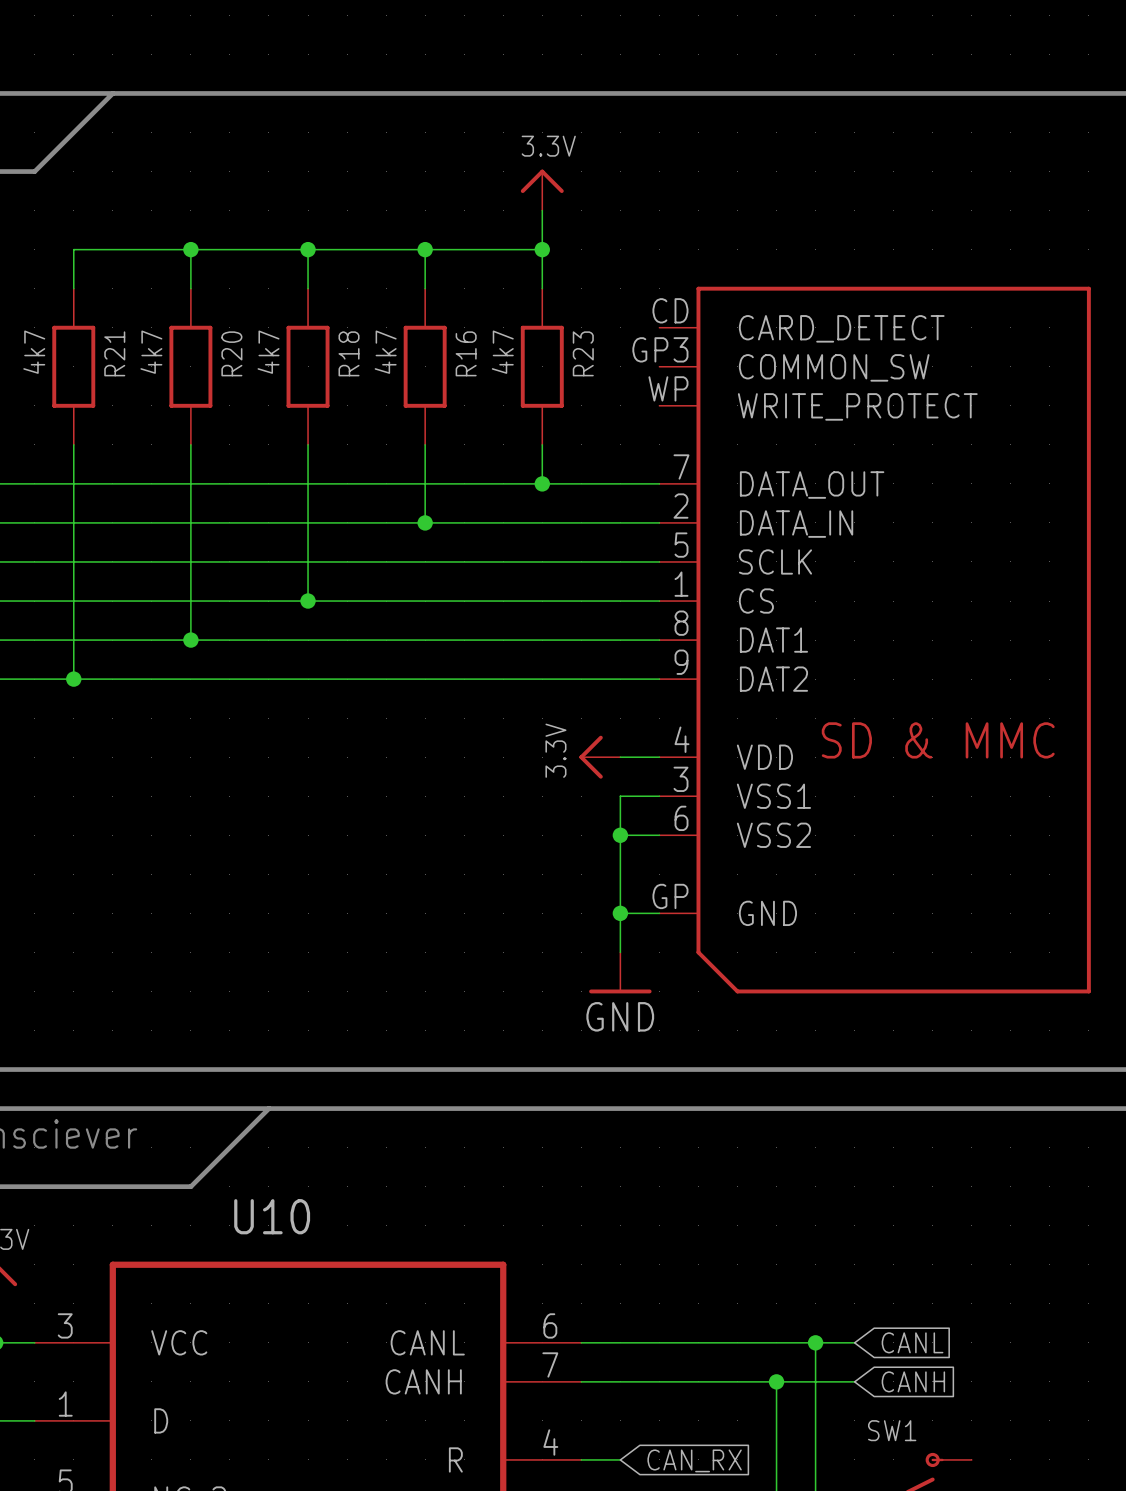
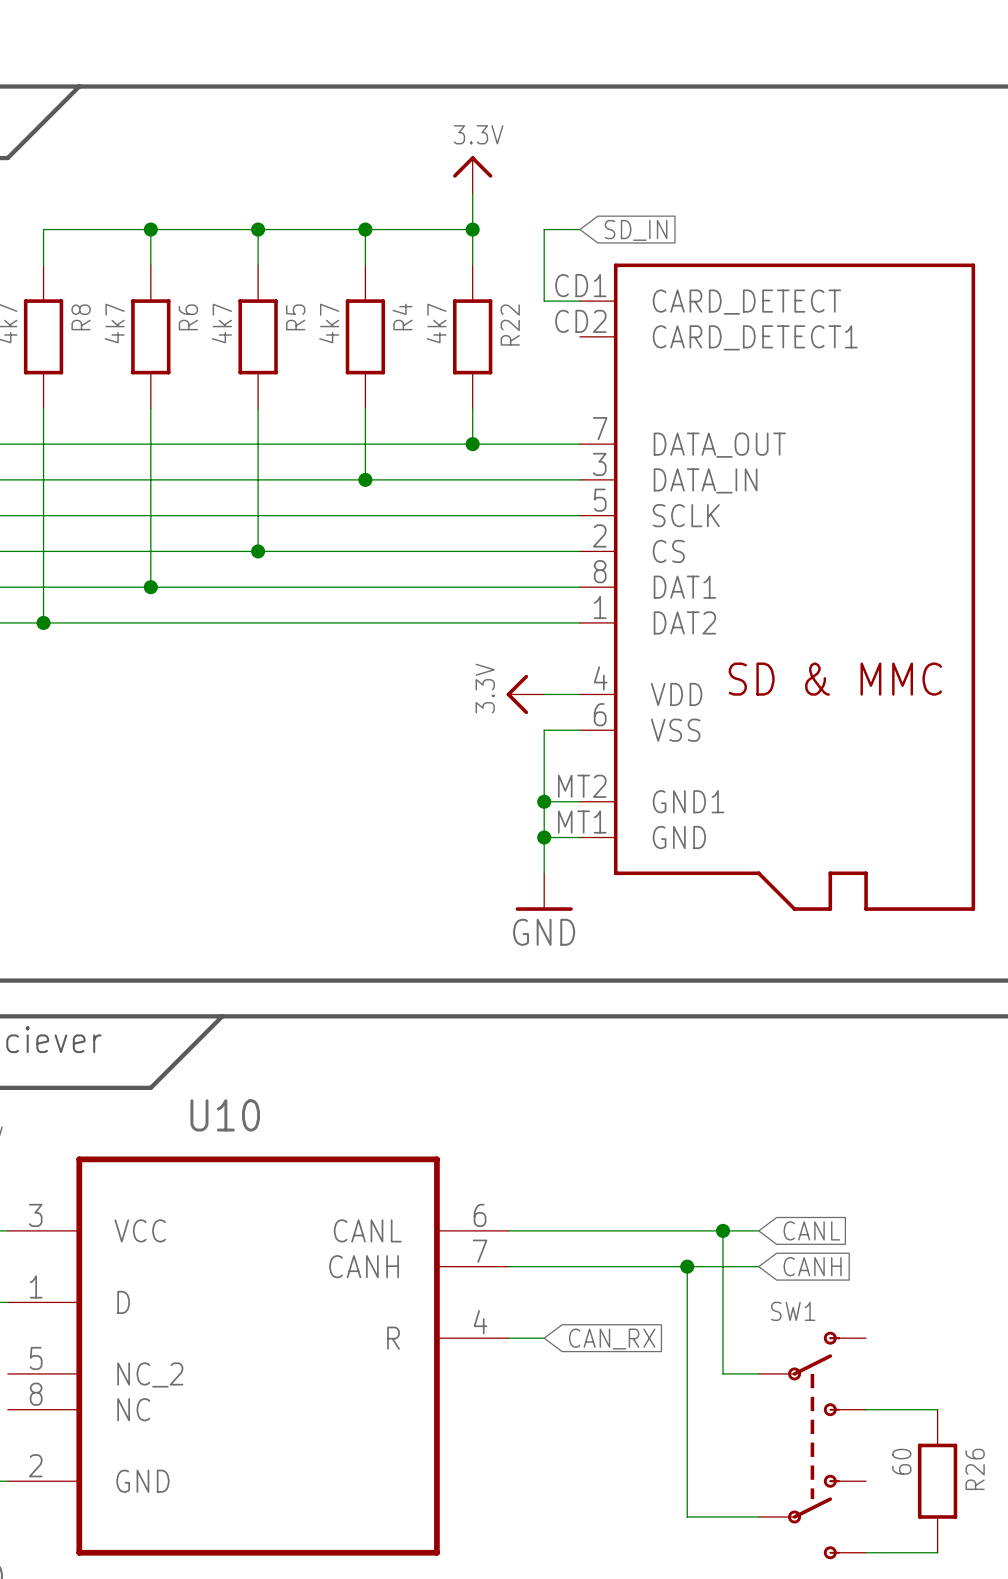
wire: none -> (579, 229) (544, 229) (544, 301) (579, 301)
global label: none -> SD_IN (636, 230)
part symbol: [659, 286, 1091, 994] -> [579, 263, 976, 911]
R21 name: R21 (114, 353) -> R8 (81, 317)
R20 name: R20 (231, 353) -> R6 (188, 317)
R18 name: R18 (349, 353) -> R5 (295, 317)
R16 name: R16 (466, 353) -> R4 (402, 316)
R23 name: R23 (583, 353) -> R22 (510, 325)
wire: (620, 835) (659, 835) -> (544, 801) (579, 801)
junction position: (620, 835) -> (544, 801)

